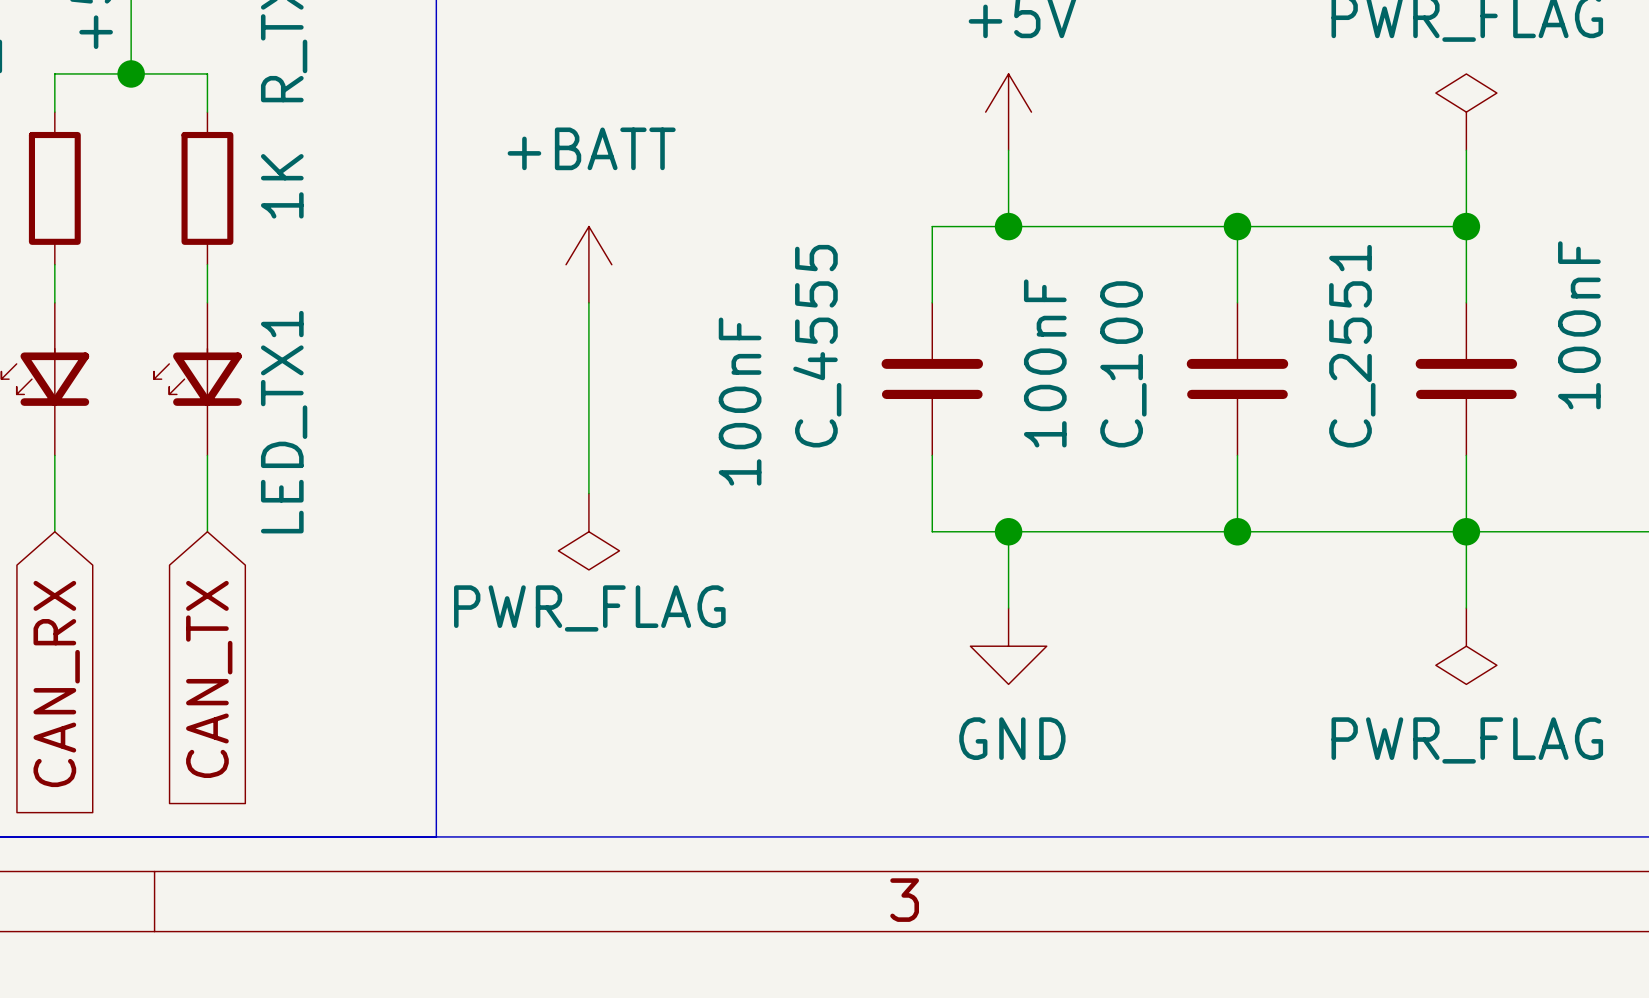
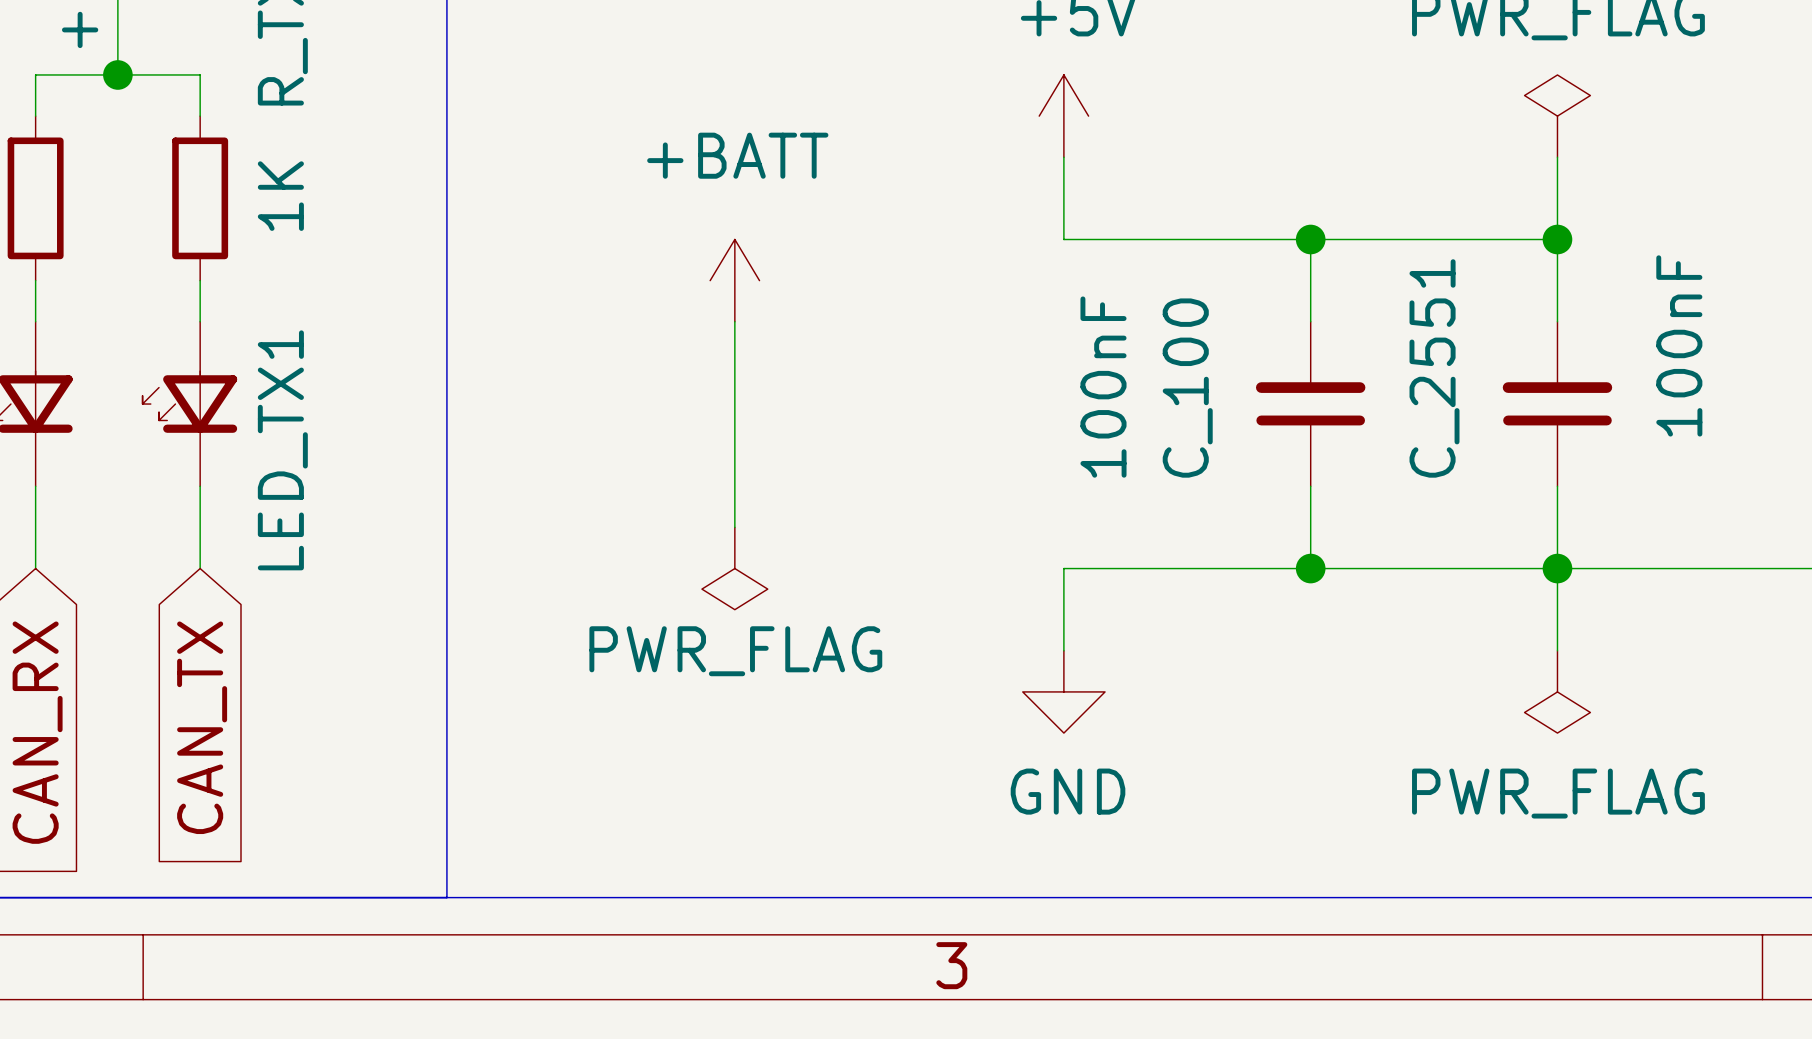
wire: (1008, 226) (932, 226) (932, 302) -> none
junction: (1008, 226) -> none
power symbol position: +BATT (588, 264) -> +BATT (734, 280)
wire: (588, 302) (588, 493) -> (734, 321) (734, 527)
C_4555: 100nF (932, 379) -> none
wire: (932, 455) (932, 531) (1008, 531) -> none
power symbol position: PWR_FLAG (588, 531) -> PWR_FLAG (734, 568)
junction: (1008, 531) -> none

